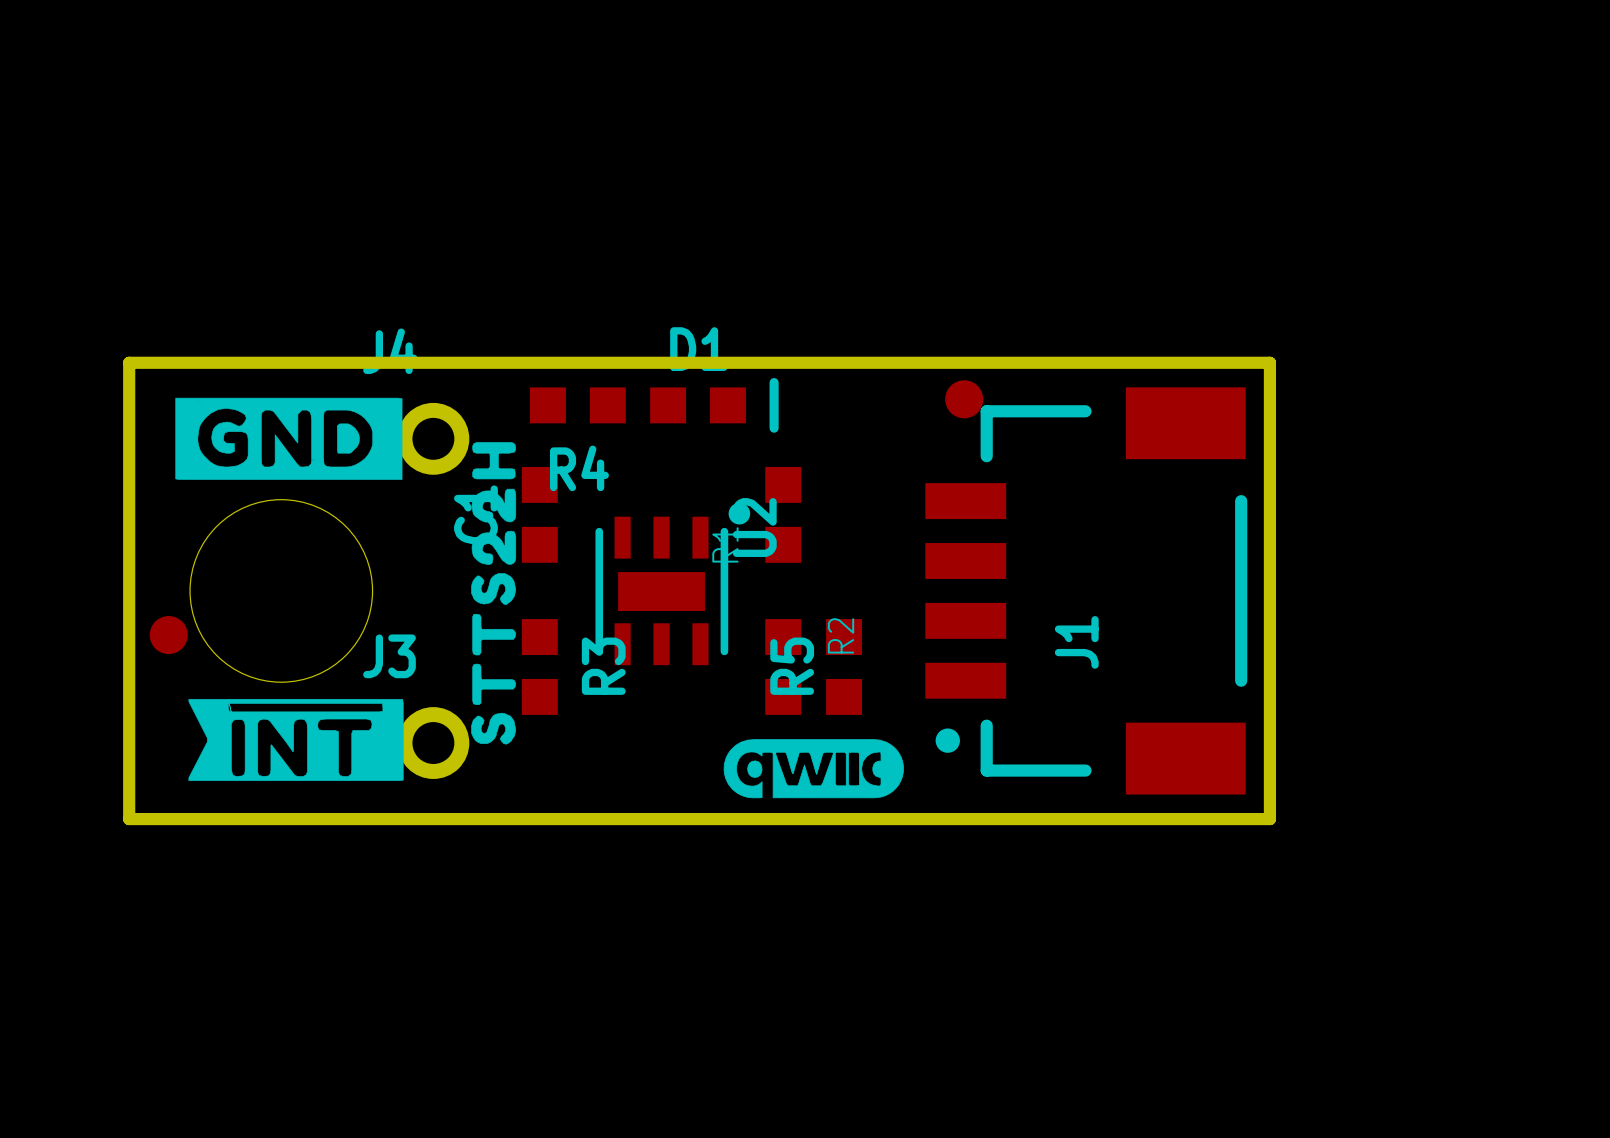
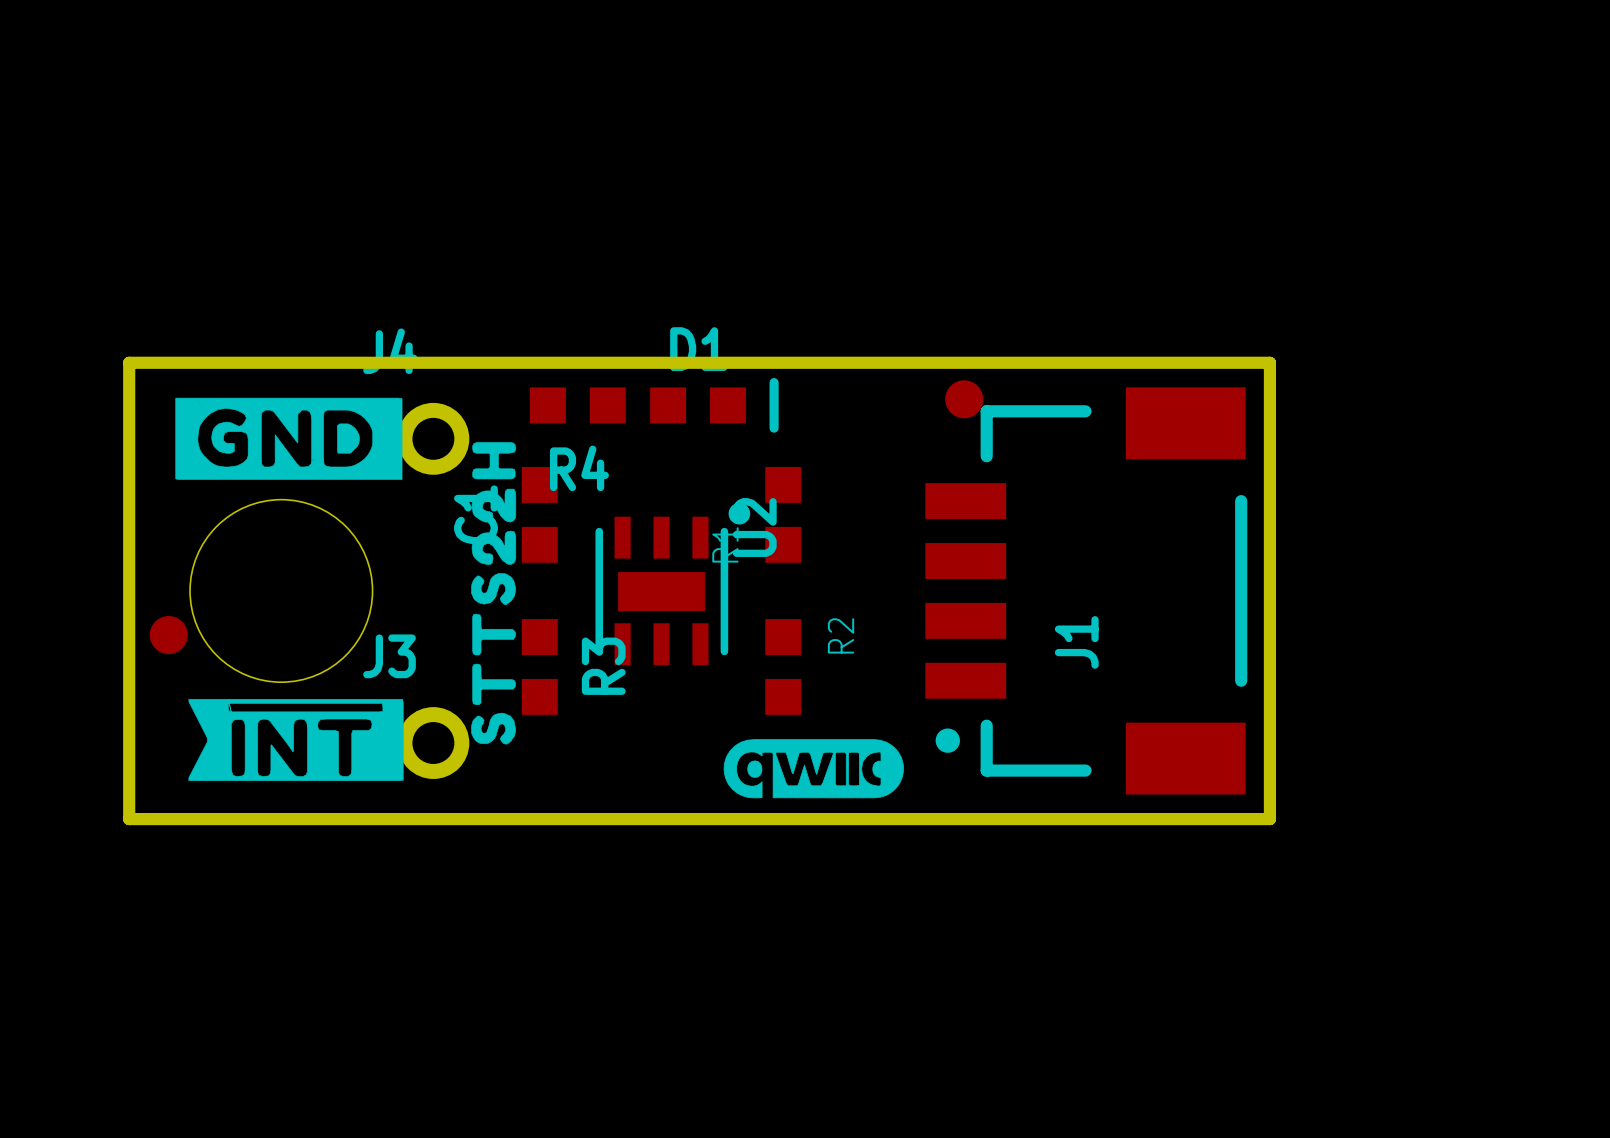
R5: (844, 666) -> none

